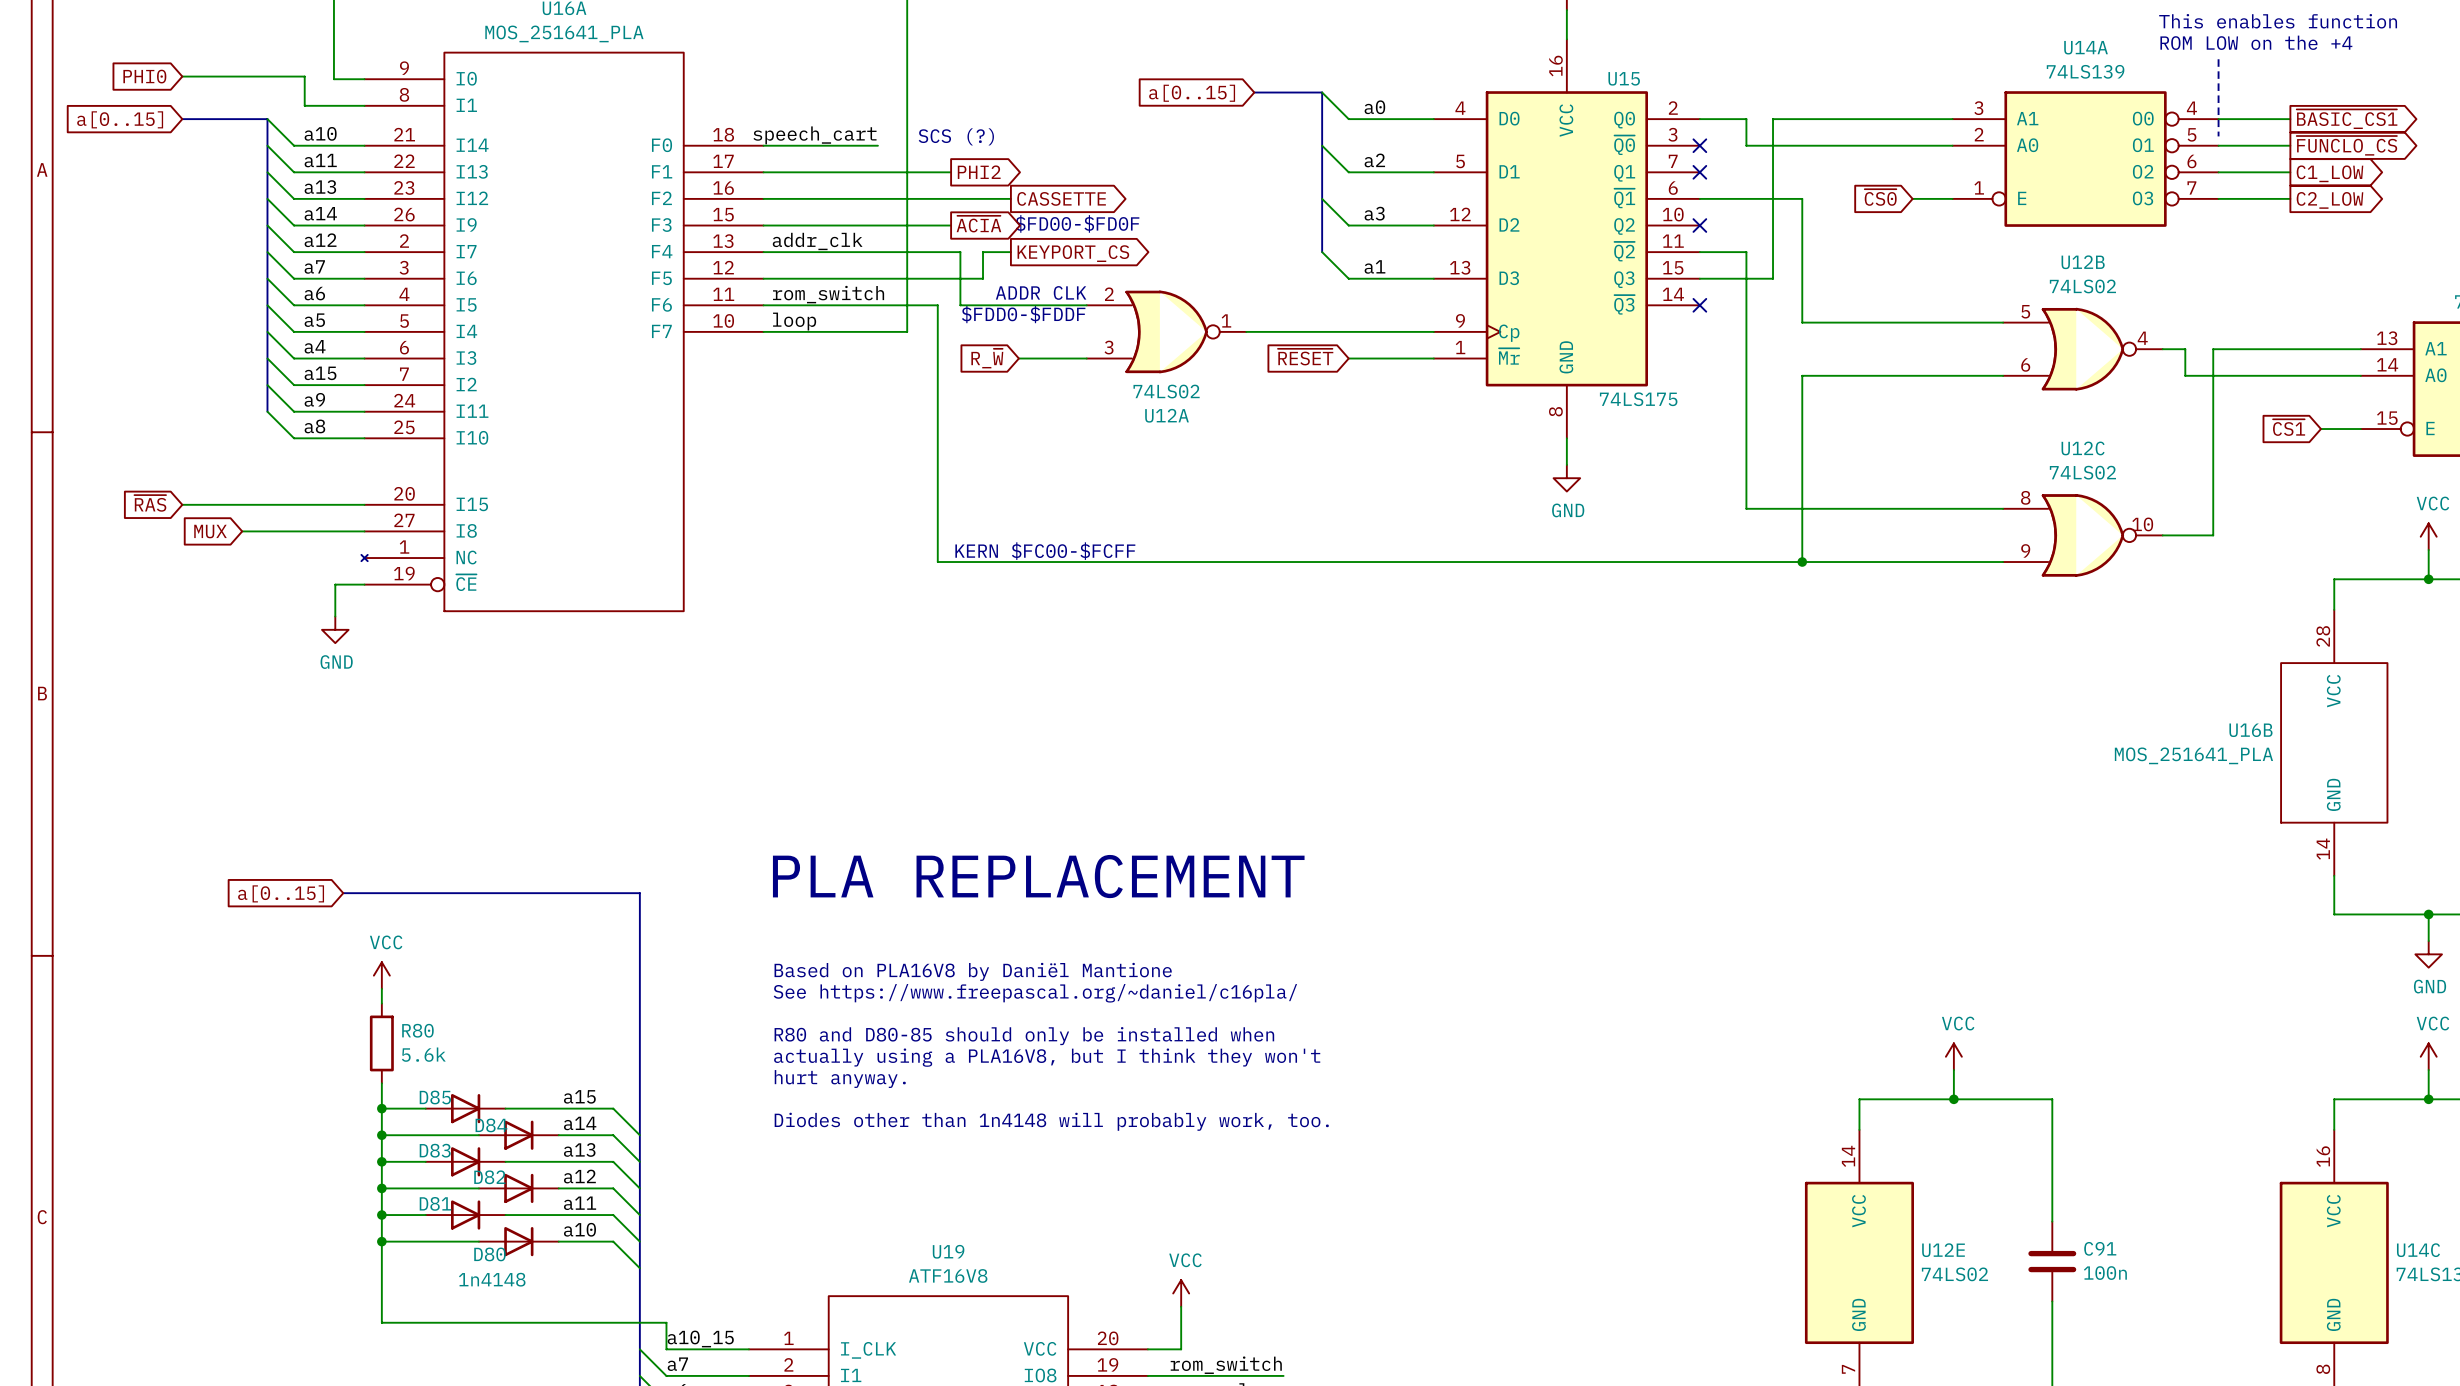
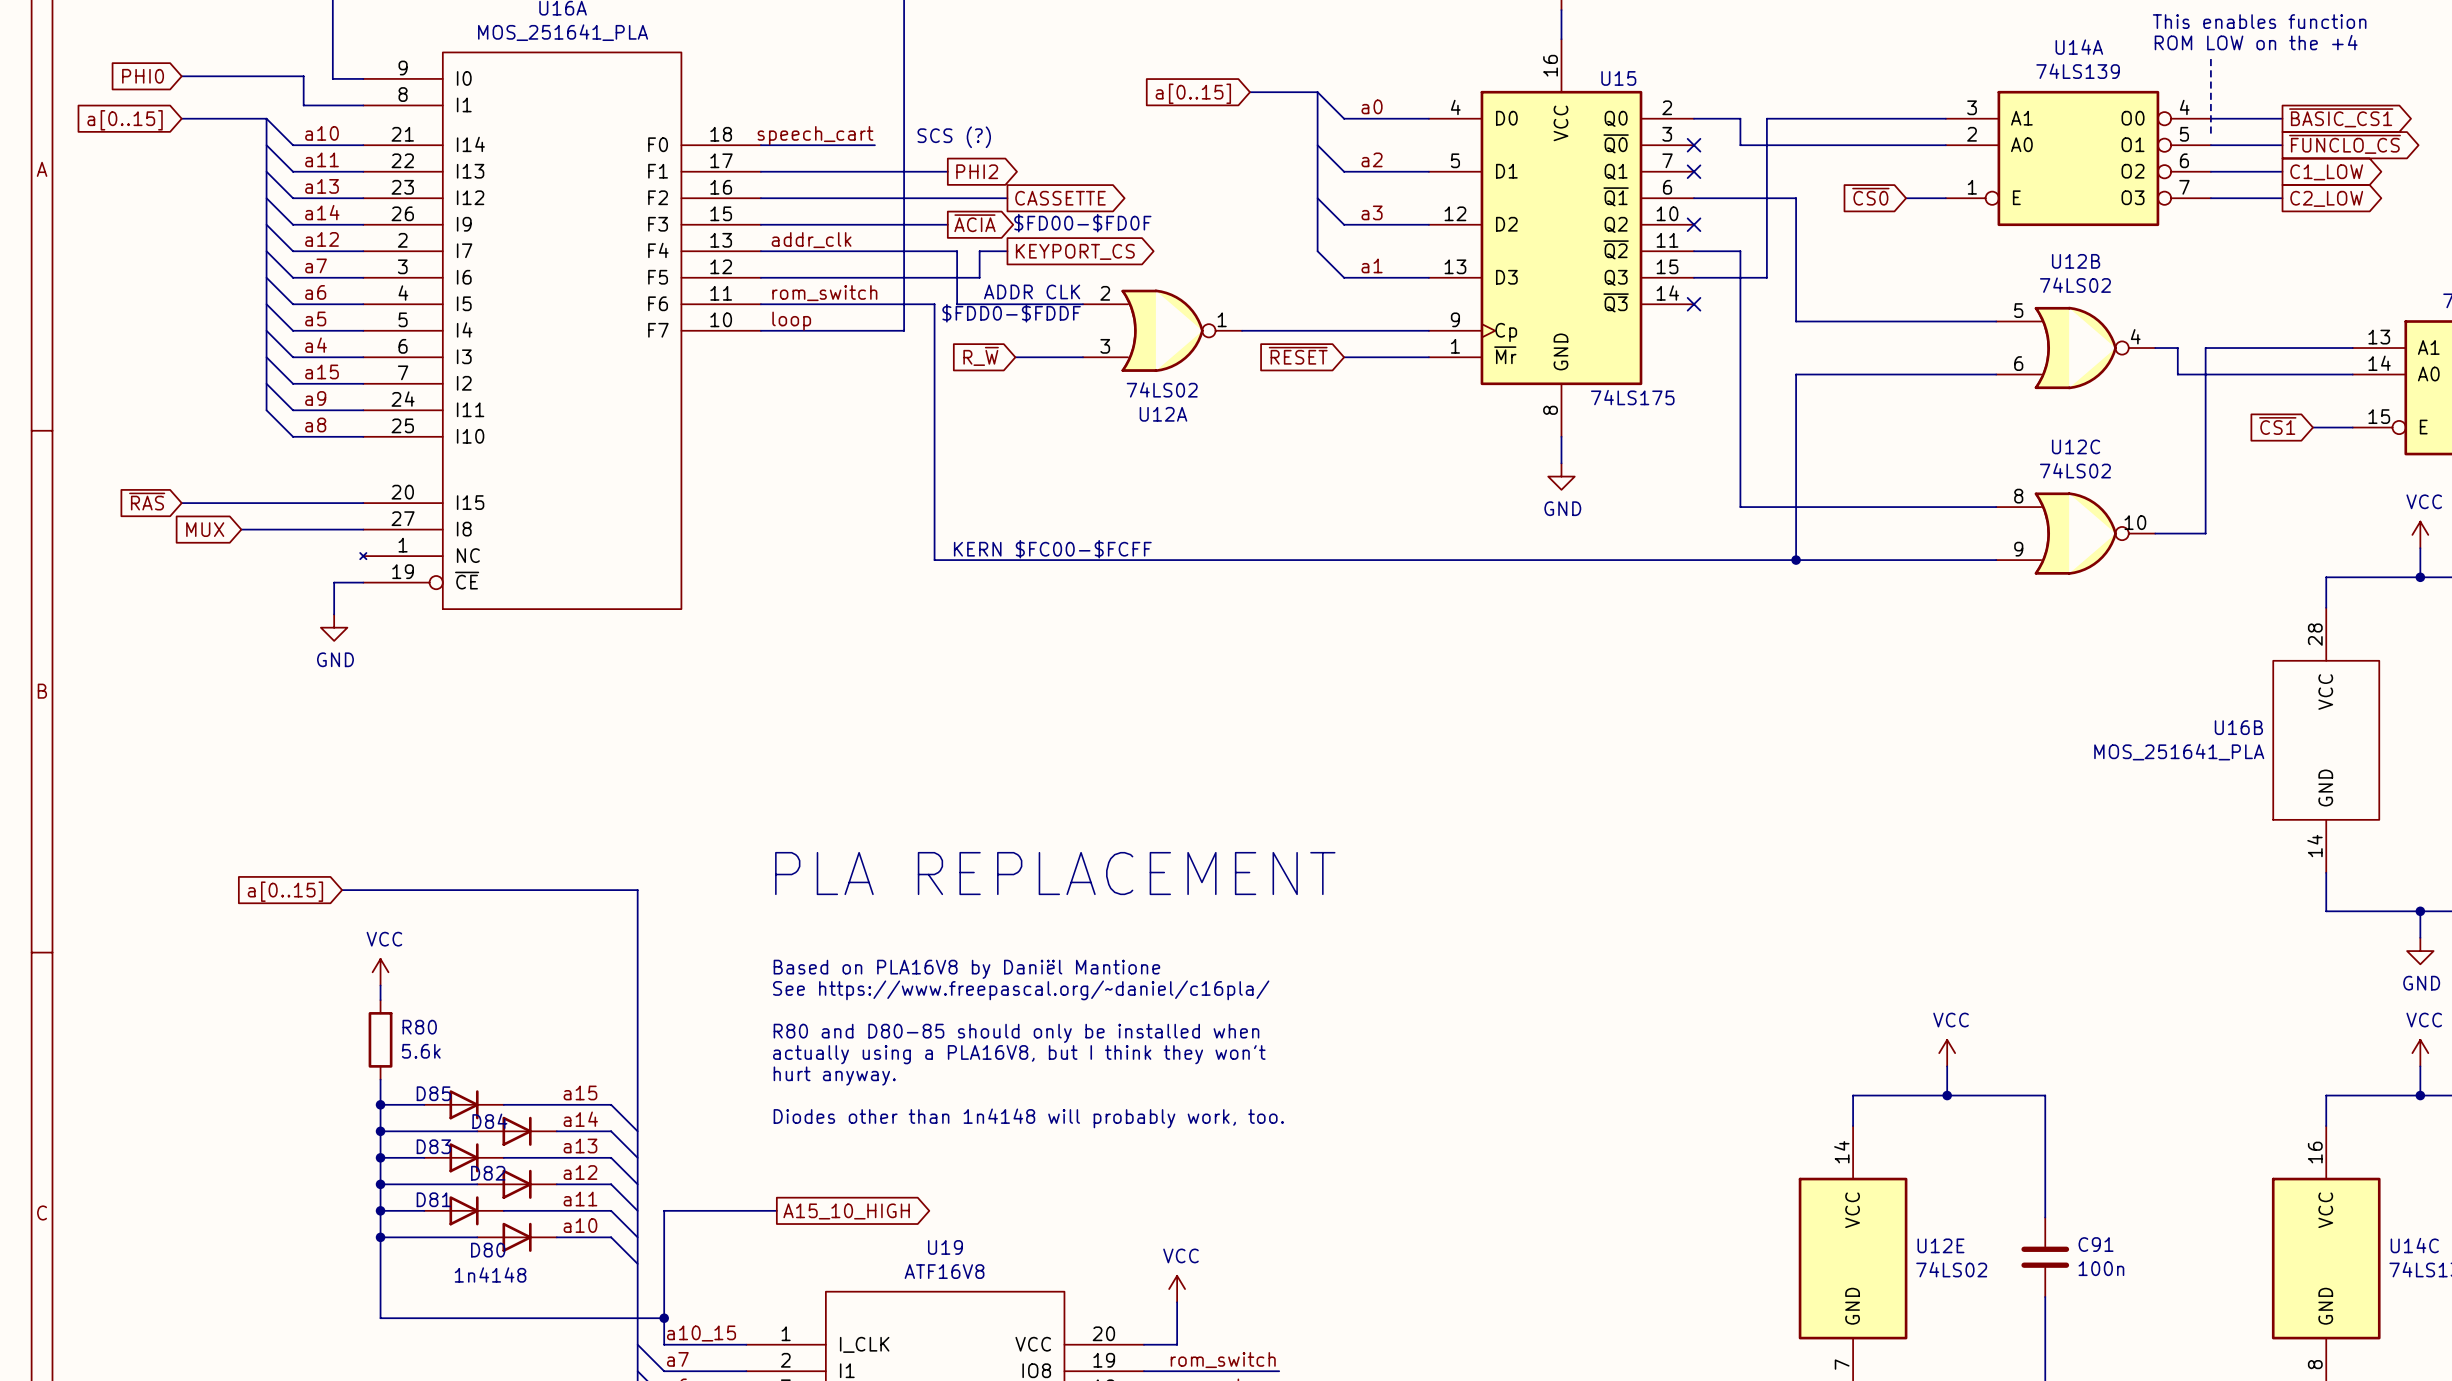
wire: none -> (776, 1210) (664, 1210) (664, 1318)
global label: none -> A15_10_HIGH (846, 1211)
junction: none -> (664, 1318)

